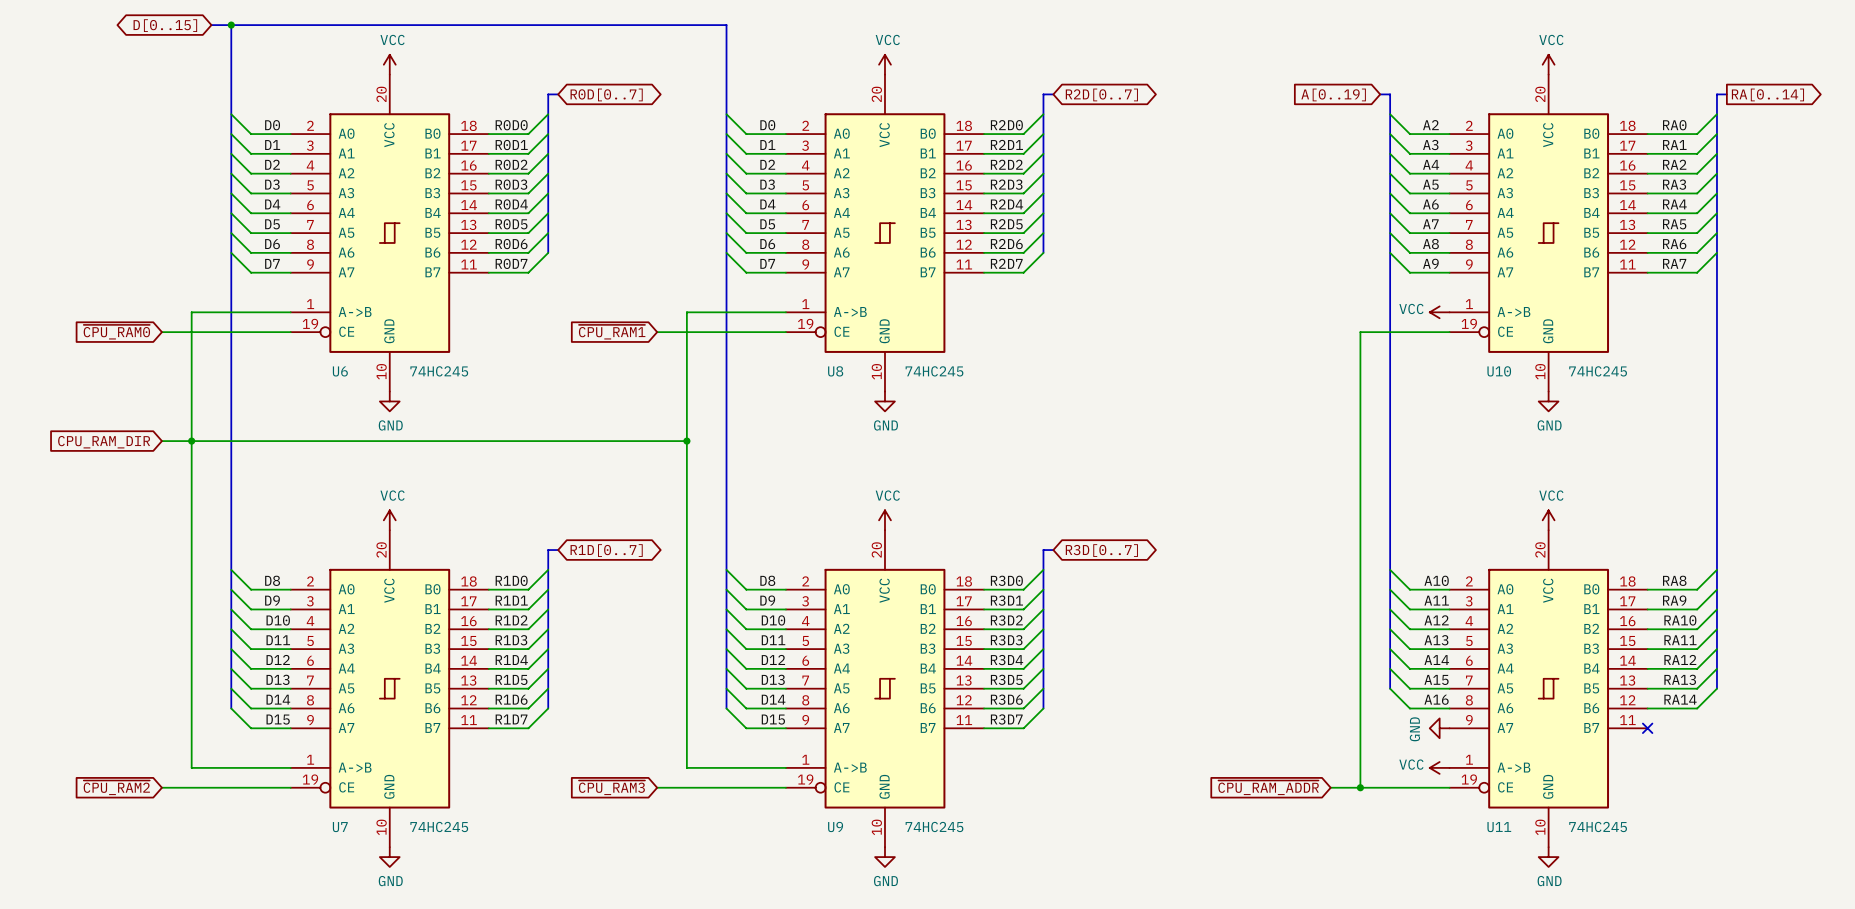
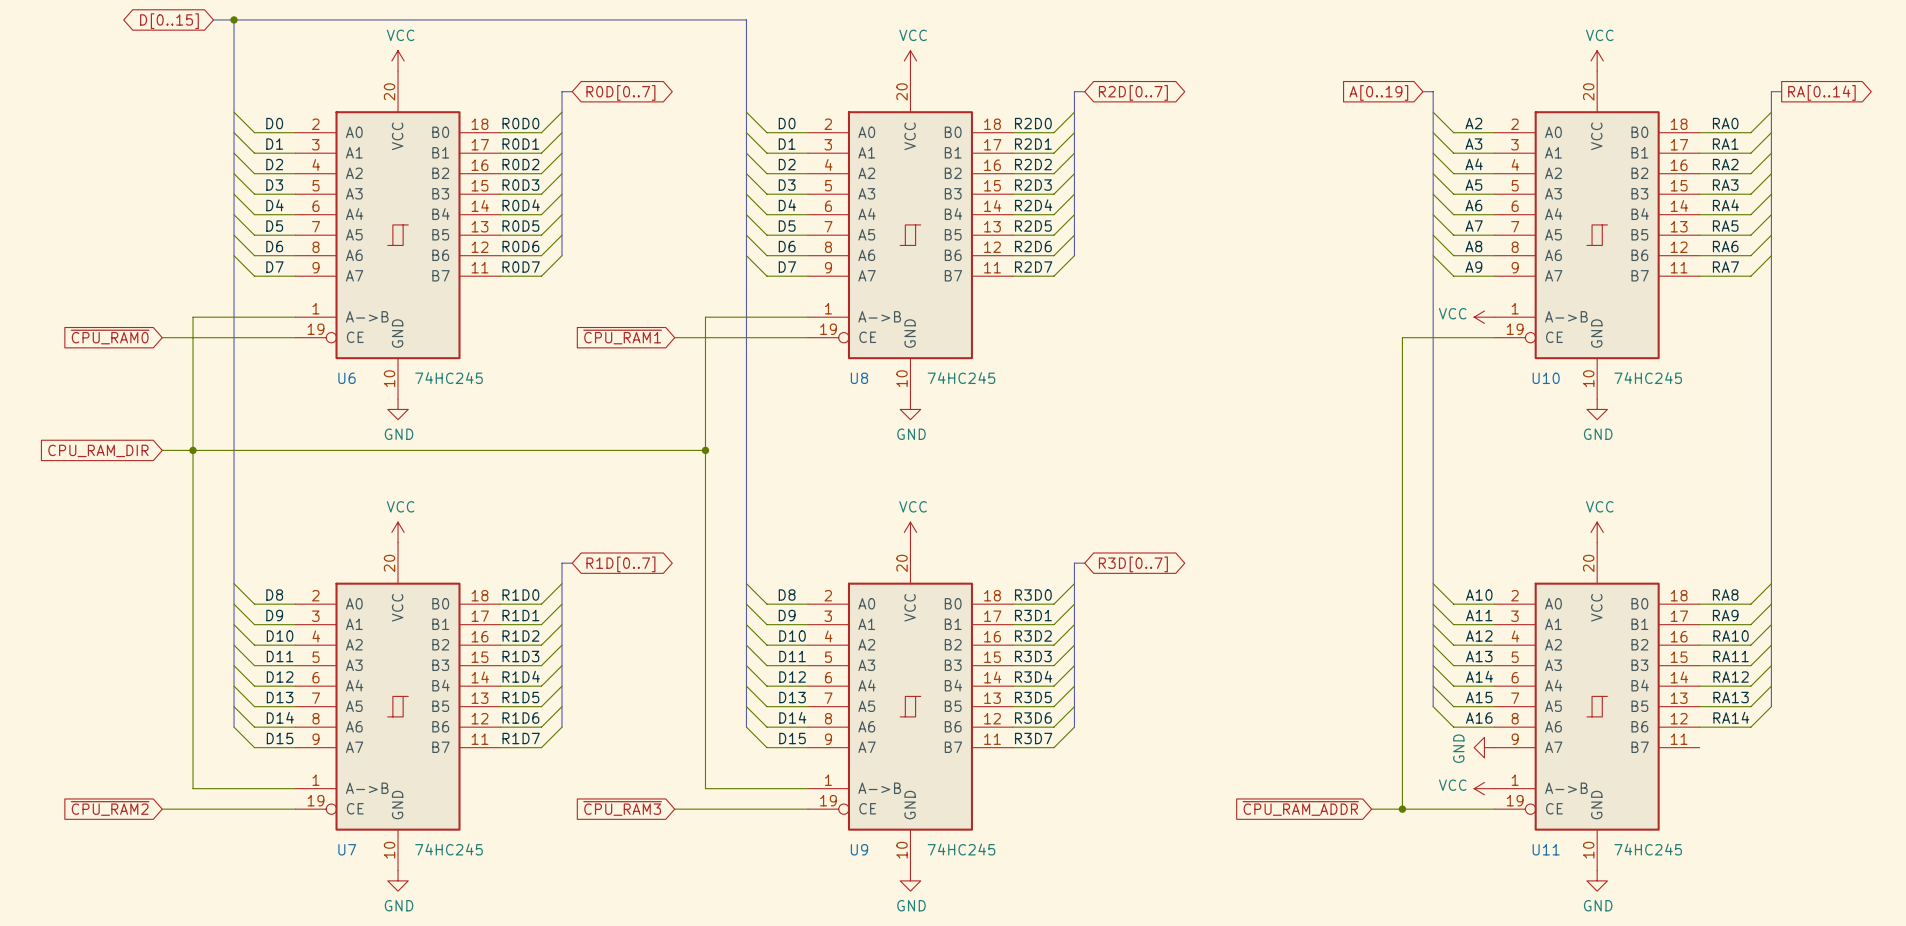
no-connect mark: (1647, 728) -> none

